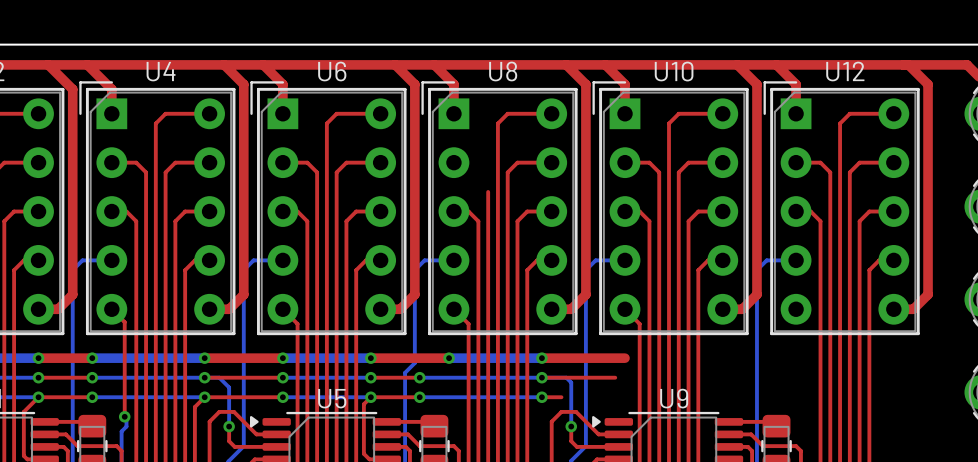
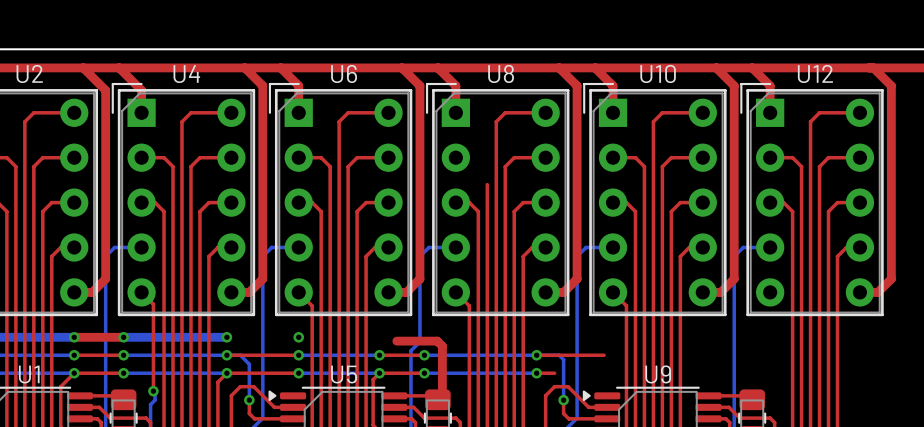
top track: (204, 358) (282, 358) -> none
bottom track: (282, 358) (370, 358) -> none
top track: (370, 358) (449, 358) -> none
via: (370, 358) -> none
bottom track: (449, 358) (541, 358) -> none
via: (449, 358) -> none
top track: (541, 358) (625, 358) -> none
via: (541, 358) -> none
top track: none -> (396, 341) (437, 341) (442, 346) (442, 395)

